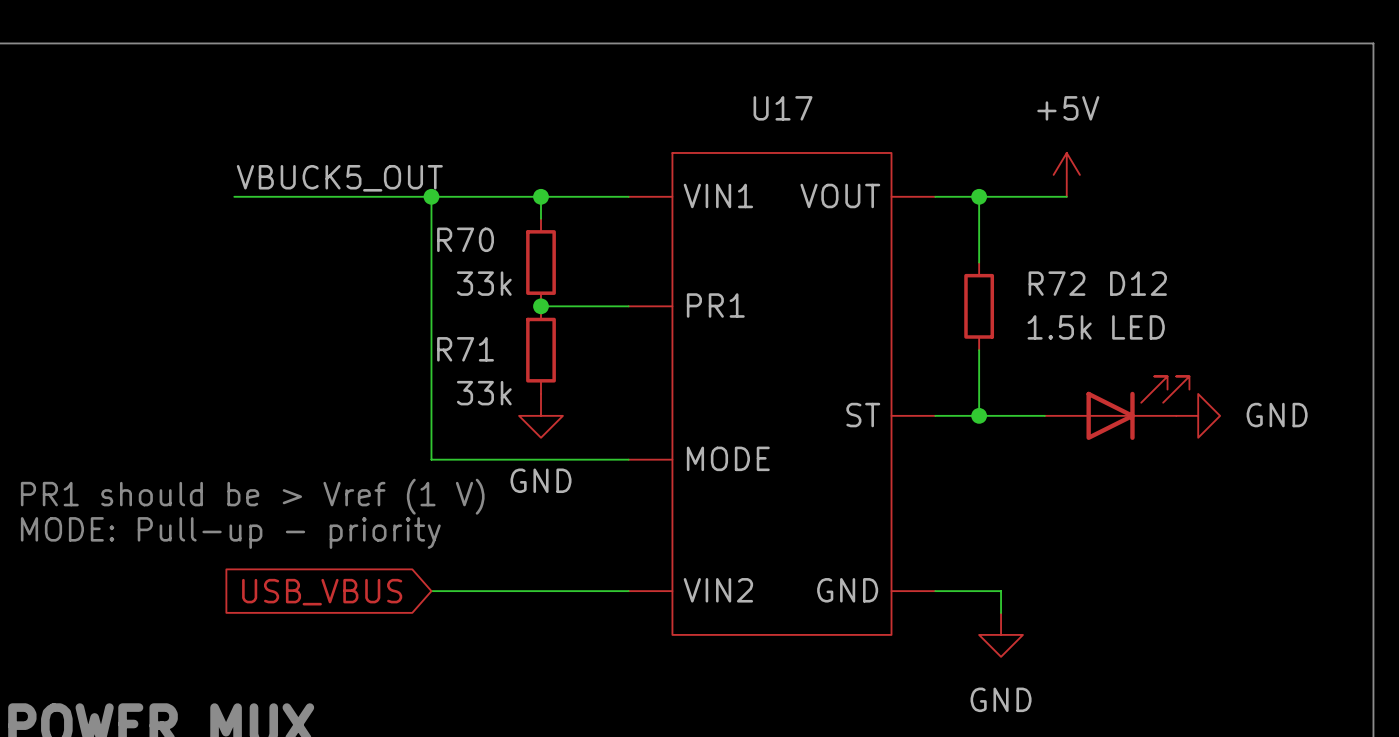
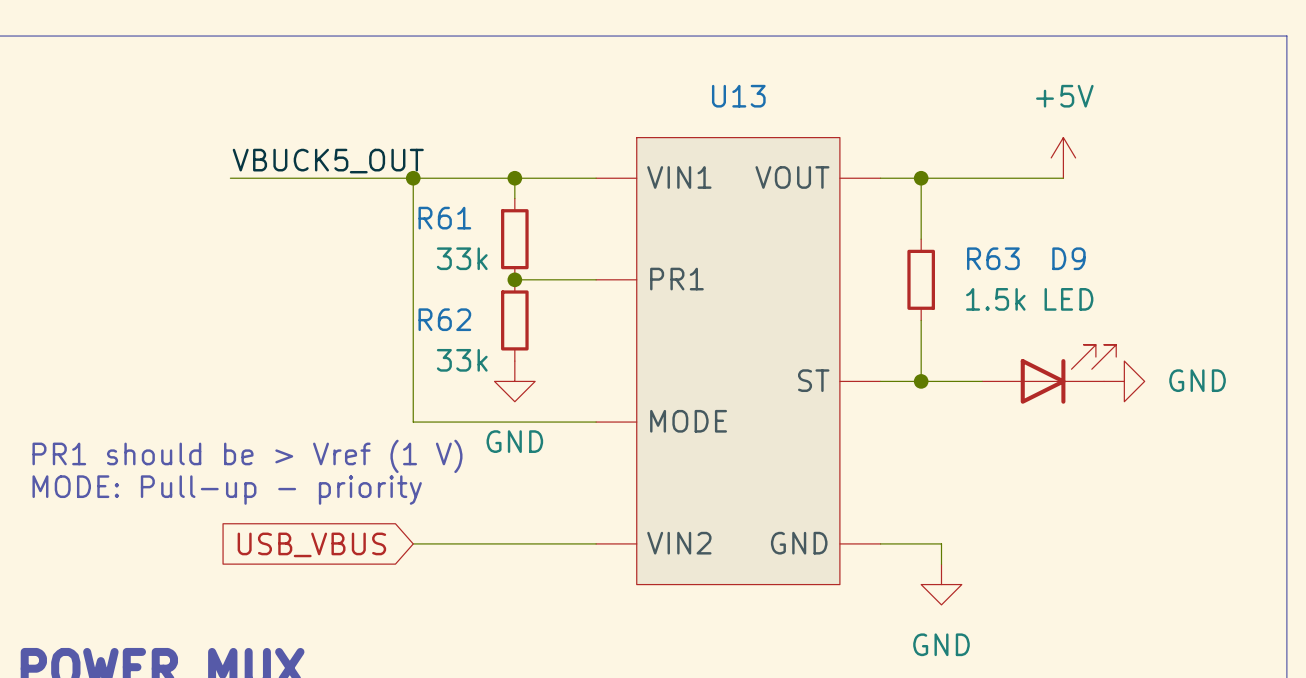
U17 name: U17 (783, 108) -> U13 (738, 96)
power symbol position: +5V (1066, 174) -> +5V (1063, 157)
wire: none -> (1002, 178) (1063, 178)
R70 name: R70 (465, 239) -> R61 (444, 218)
R72 name: R72 (1057, 283) -> R63 (993, 258)
D12 name: D12 (1138, 283) -> D9 (1068, 258)
R71 name: R71 (465, 349) -> R62 (444, 319)

